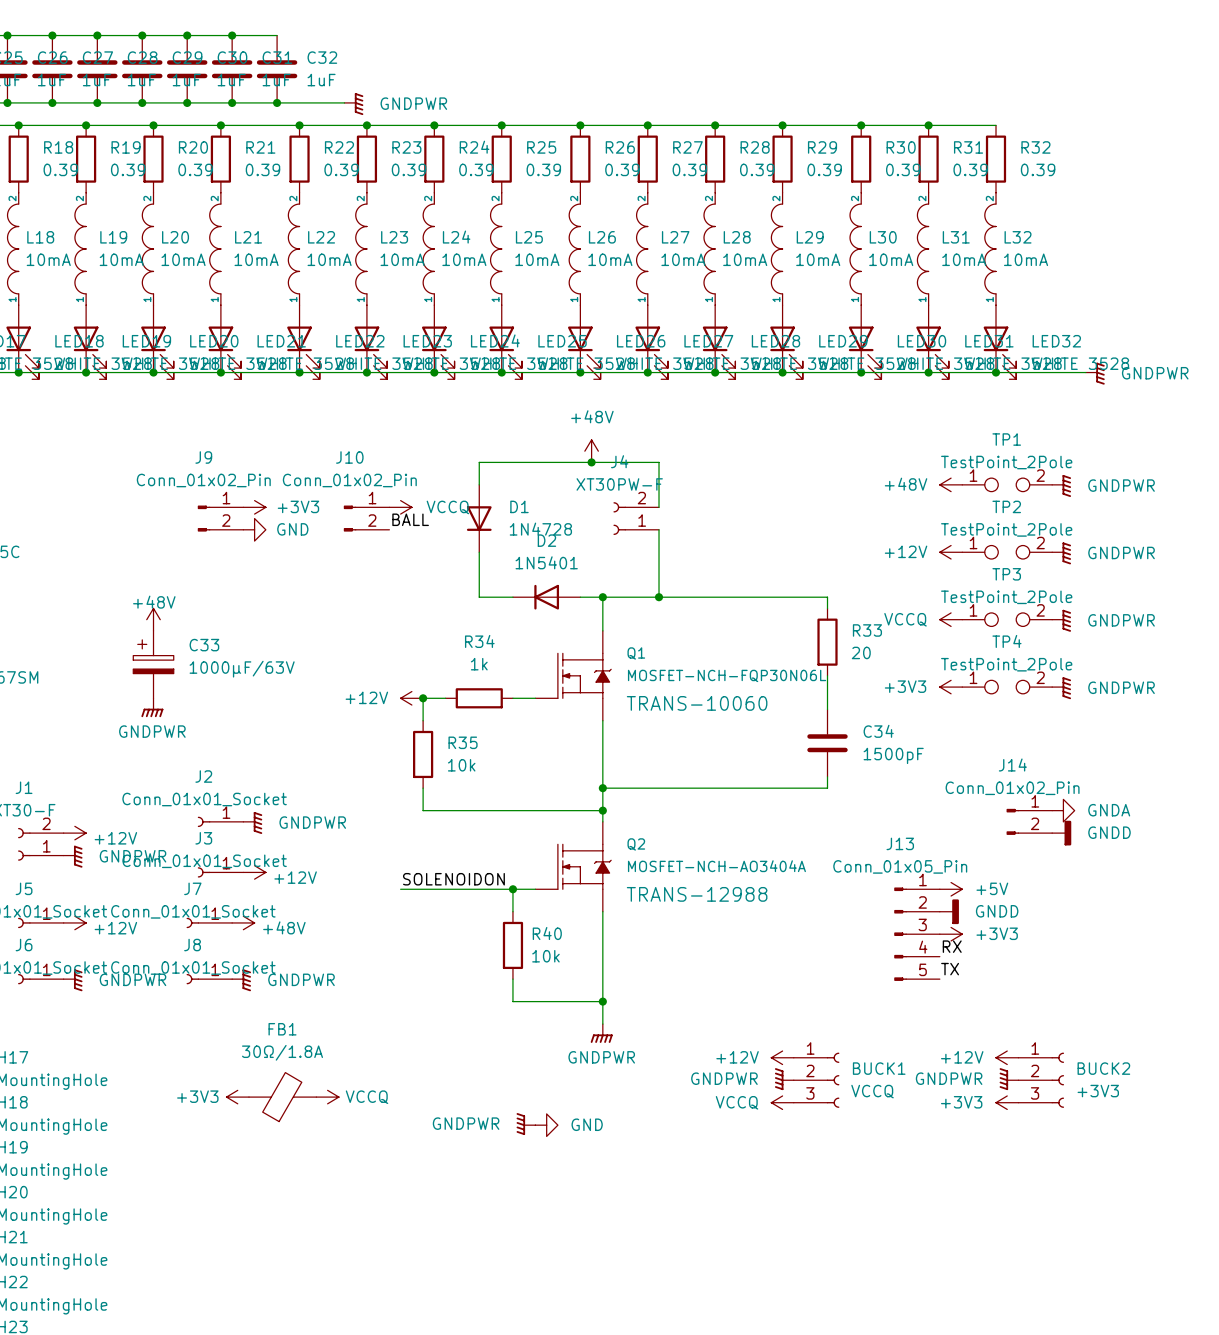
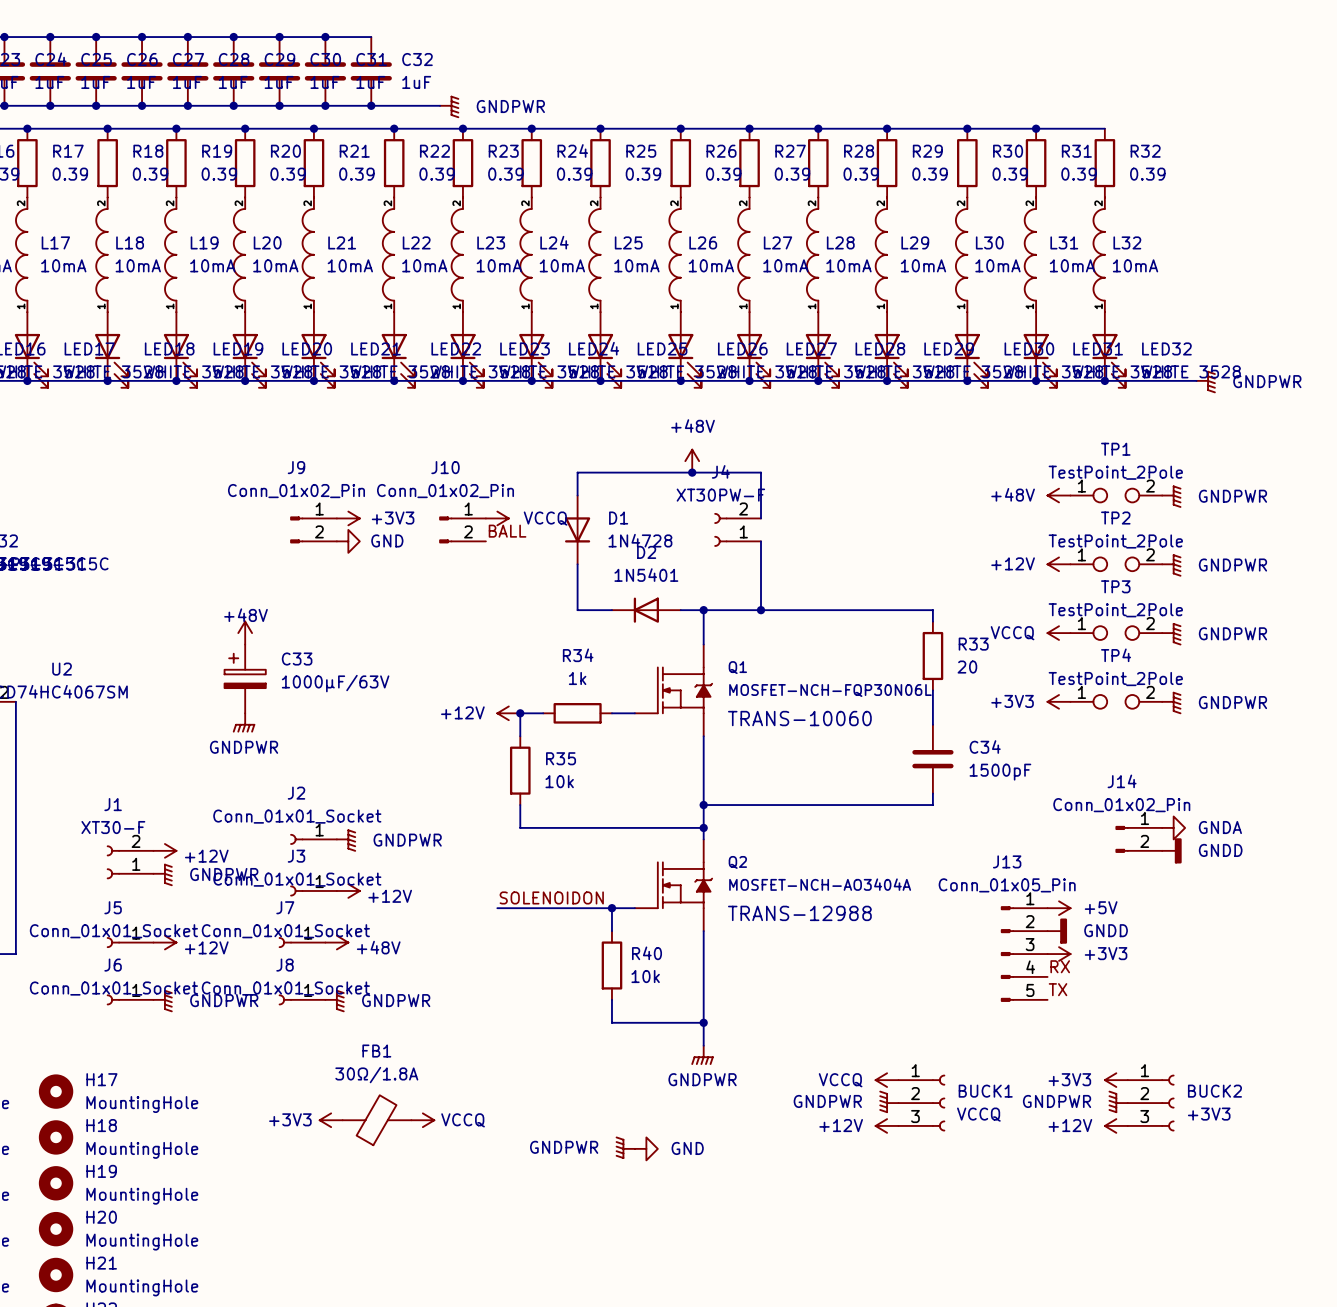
power symbol: +12V (782, 1057) -> VCCQ (887, 1080)
power symbol: +12V (1007, 1057) -> +3V3 (1116, 1080)
power symbol: VCCQ (782, 1102) -> +12V (887, 1125)
power symbol: +3V3 (1007, 1102) -> +12V (1116, 1125)

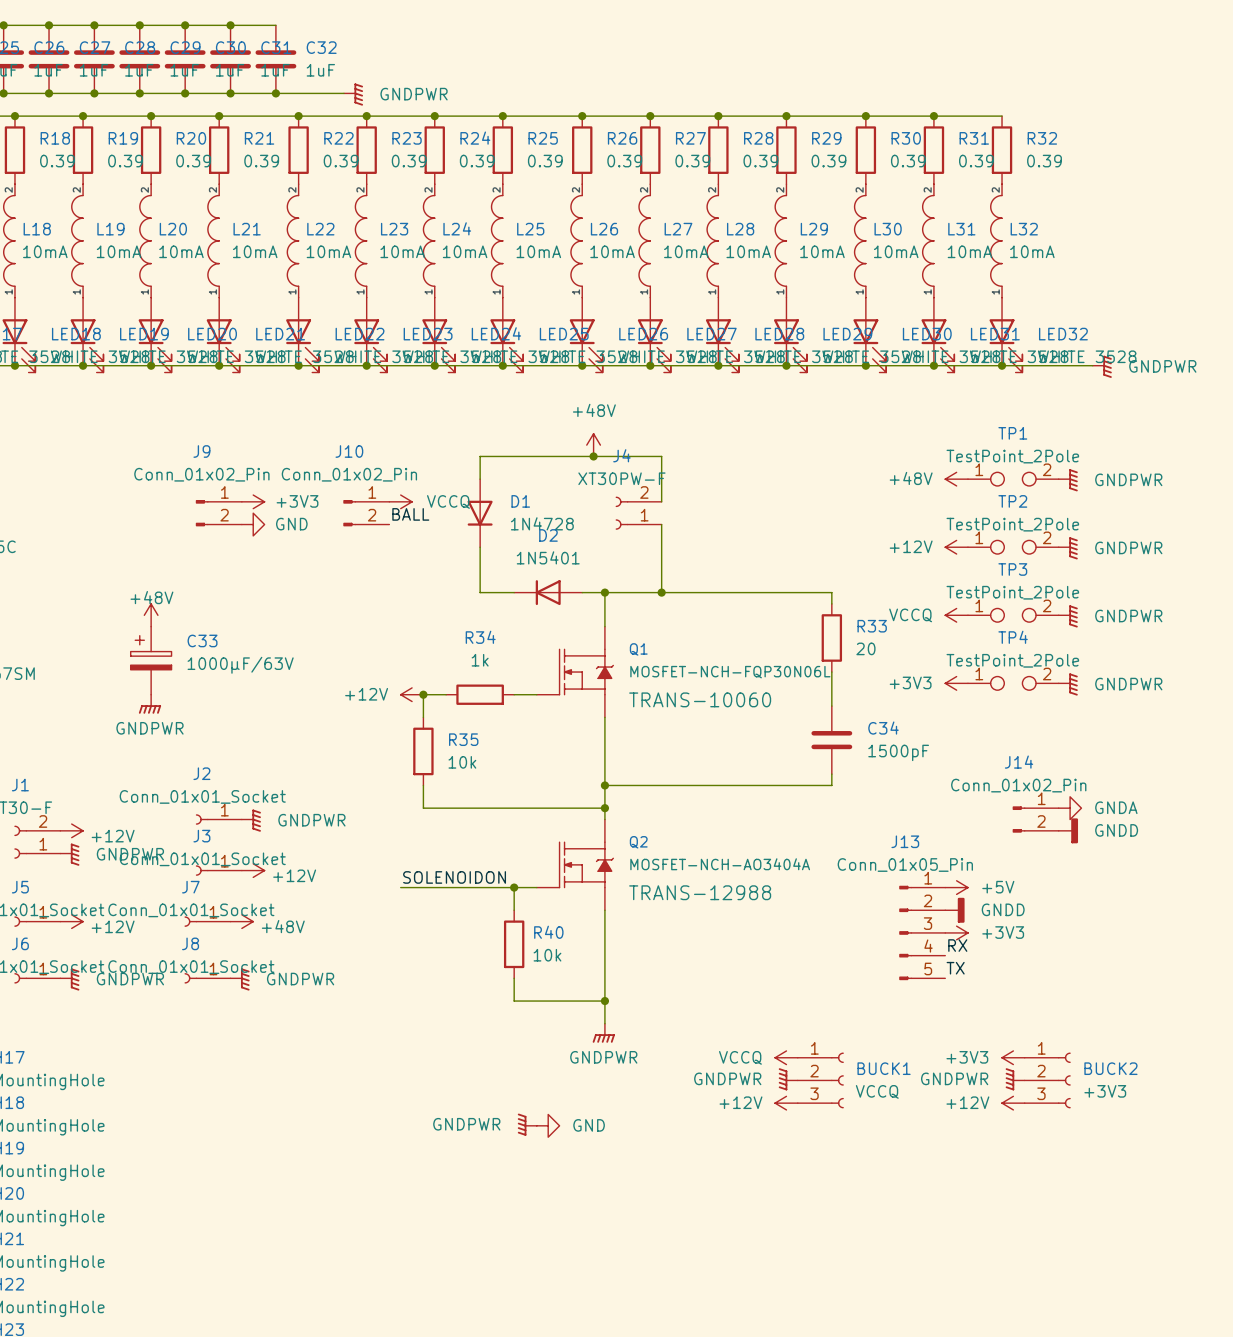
power symbol: +3V3 (331, 1120) -> none
FB1: 30Ω/1.8A (377, 1120) -> none
power symbol: VCCQ (422, 1120) -> none

